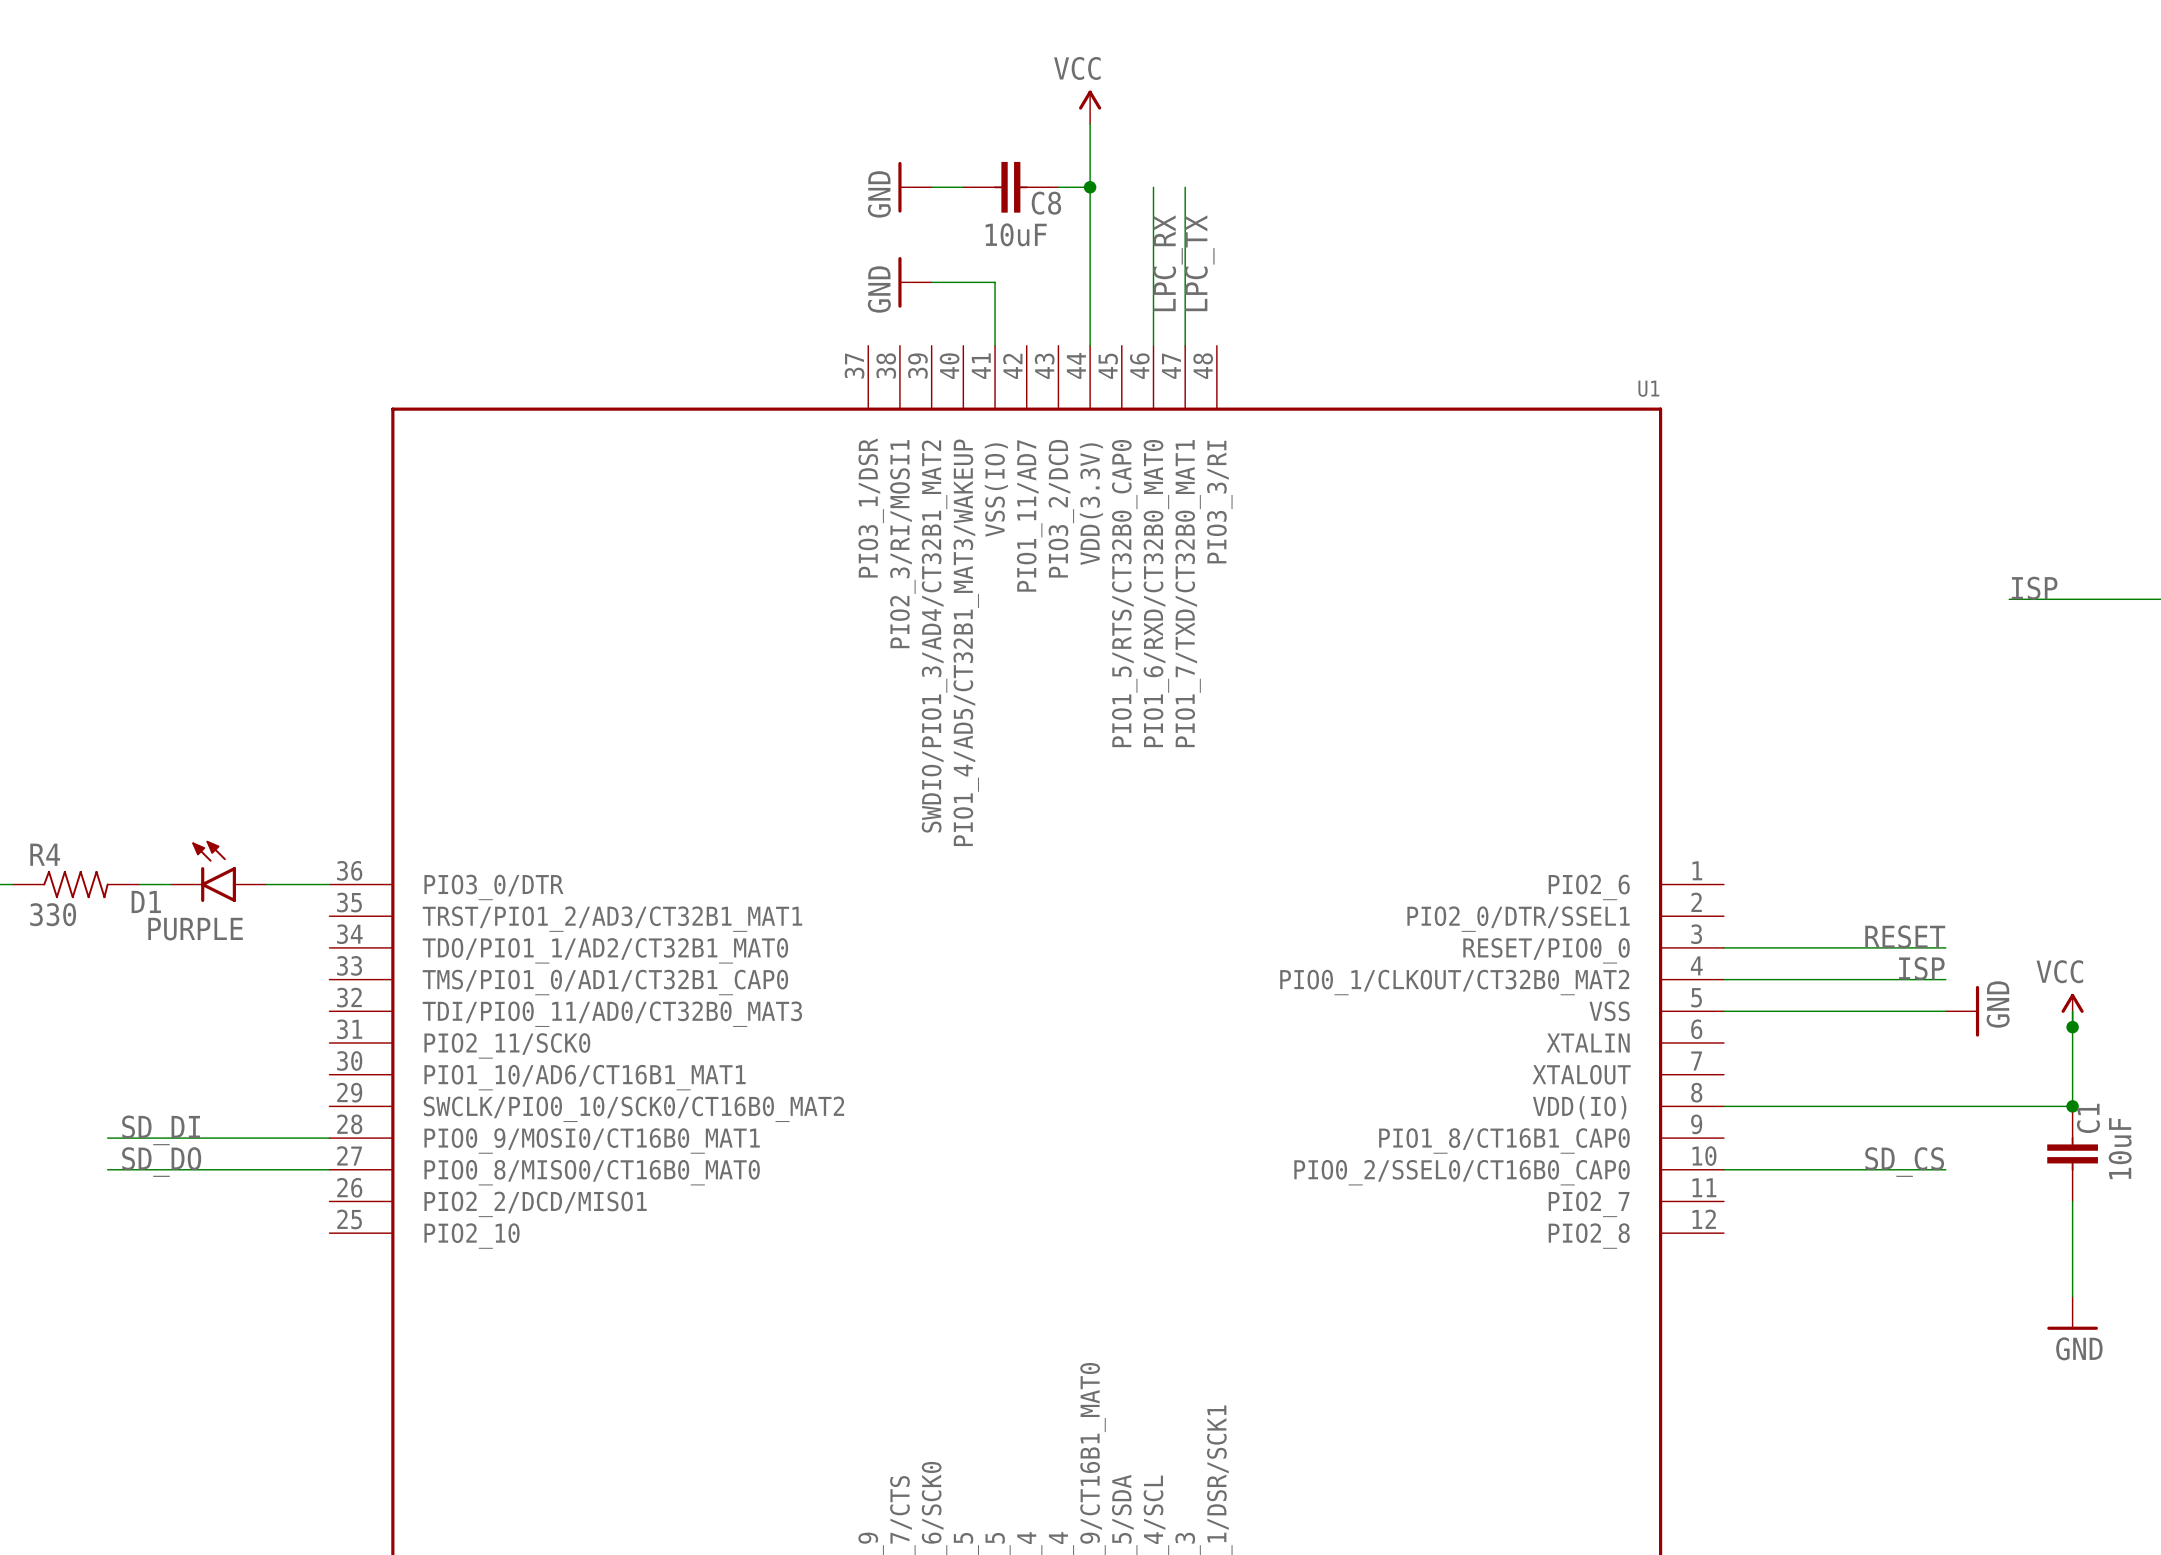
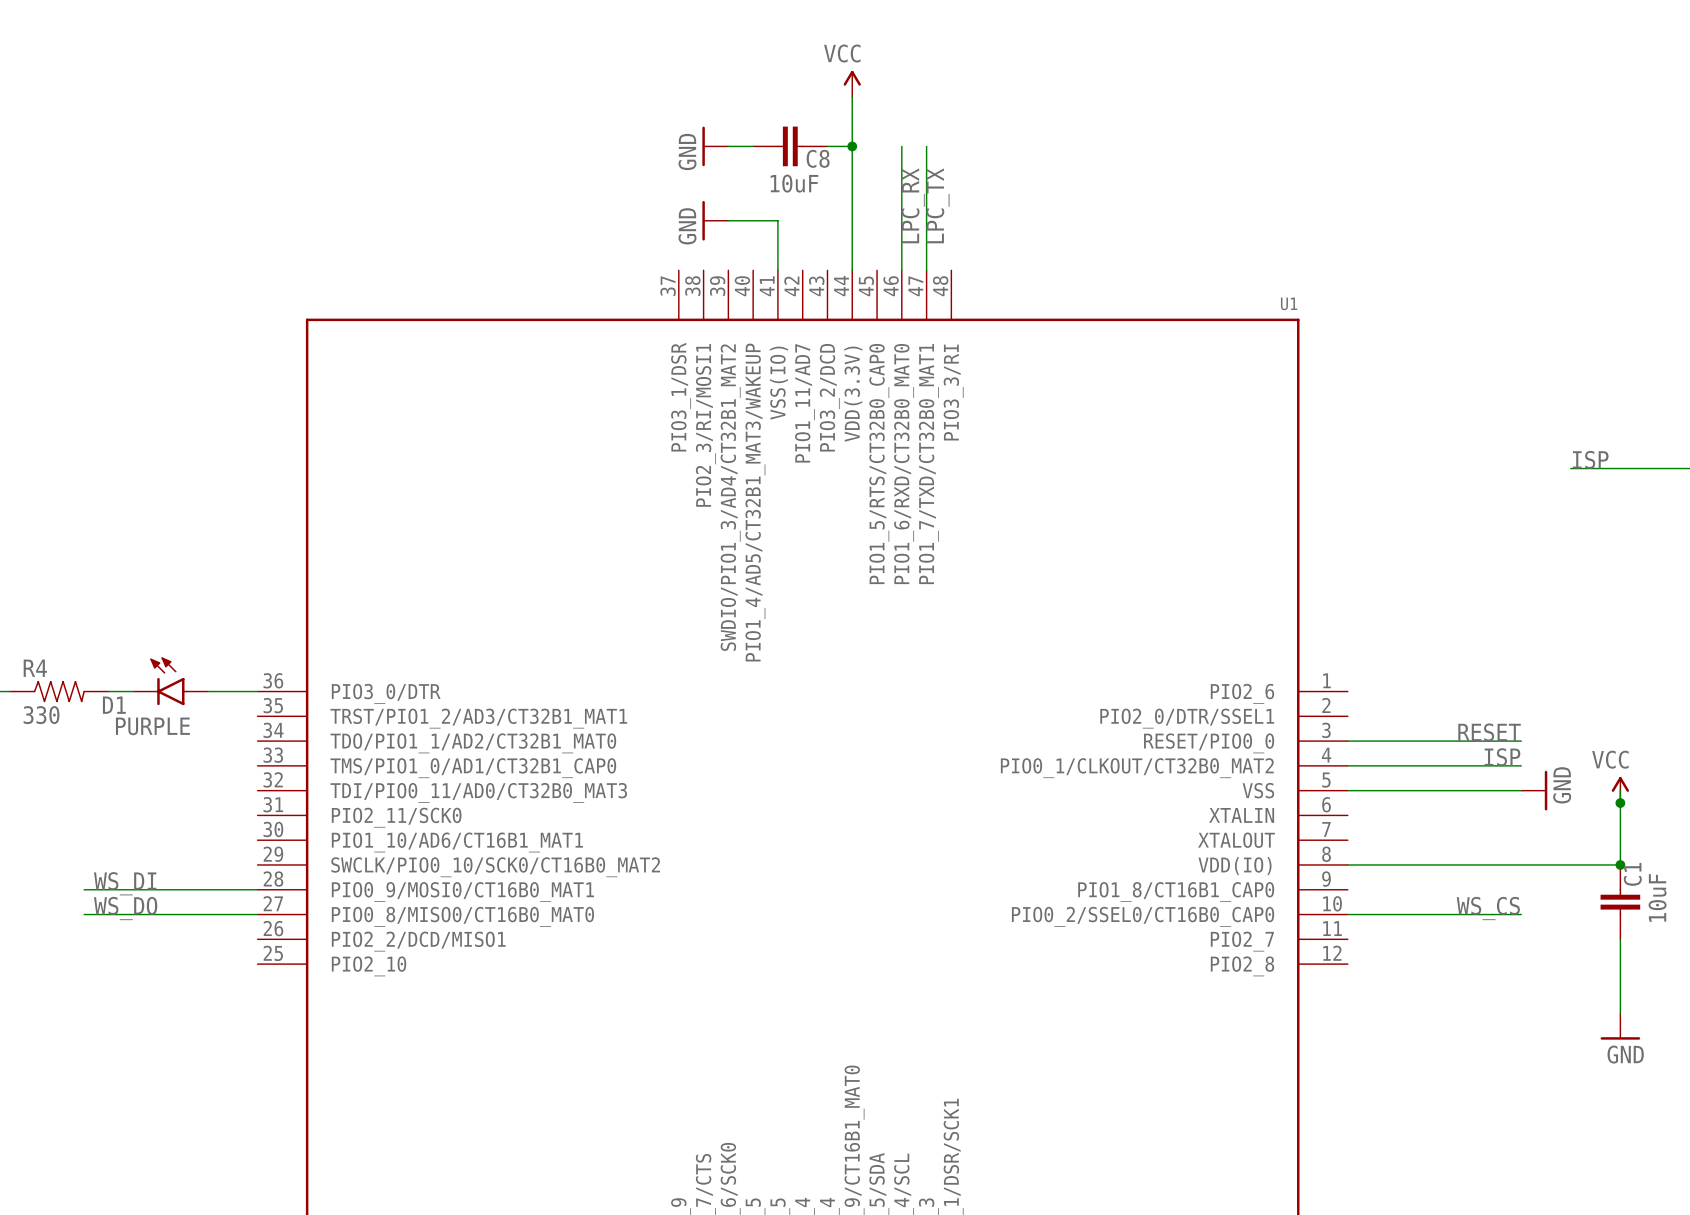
label: SD_DI (161, 1130) -> WS_DI (125, 883)
label: SD_DO (161, 1162) -> WS_DO (125, 908)
label: SD_CS (1904, 1162) -> WS_CS (1488, 908)

